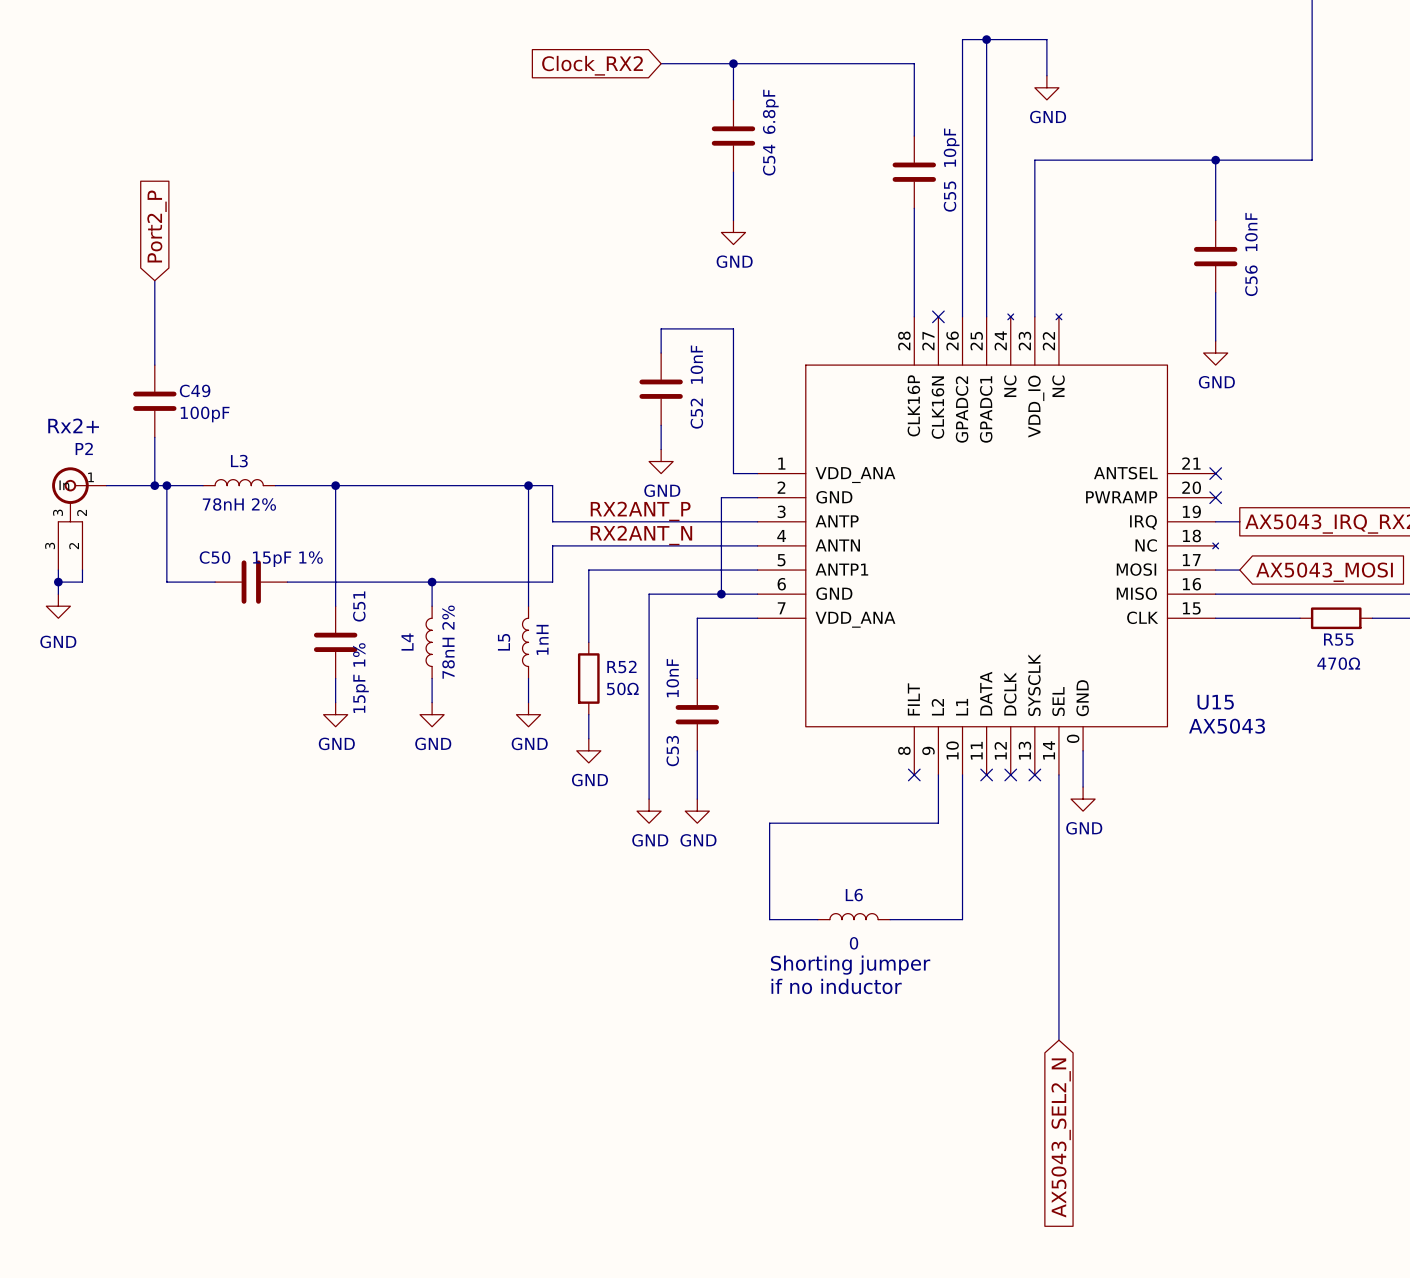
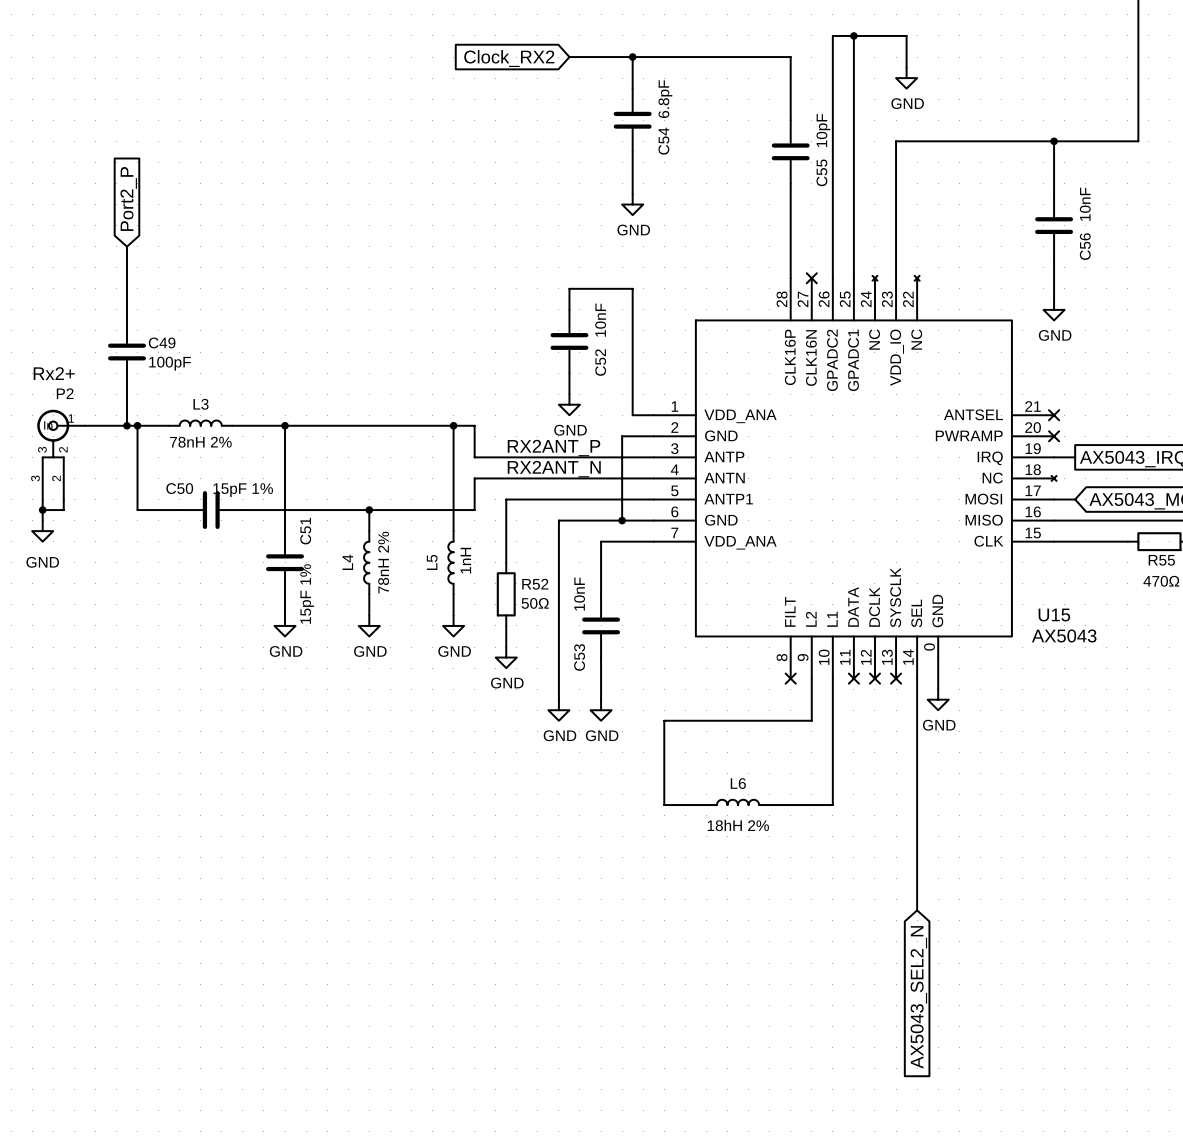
L6 value: 0 (854, 943) -> 18hH 2% (738, 825)
text: Shorting jumper (850, 965) -> none
text: if no inductor (836, 986) -> none

